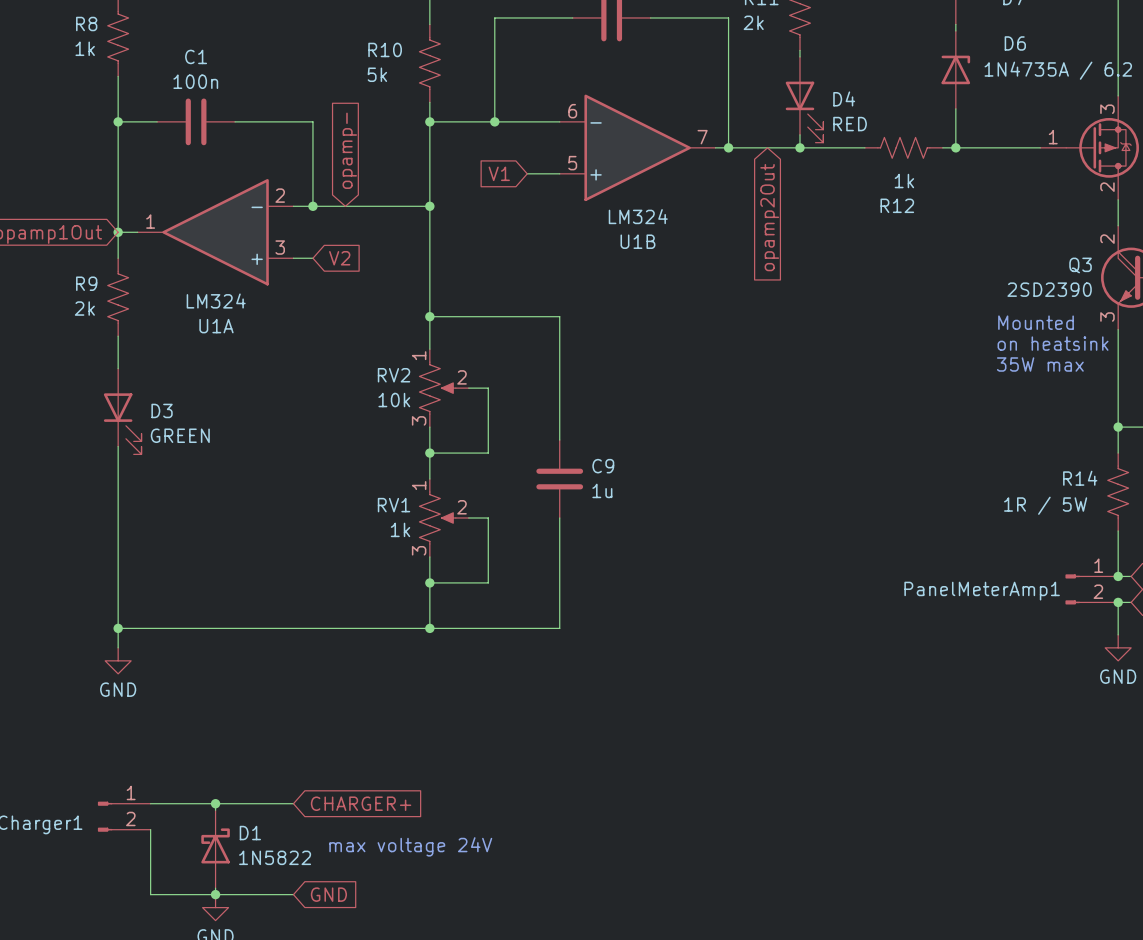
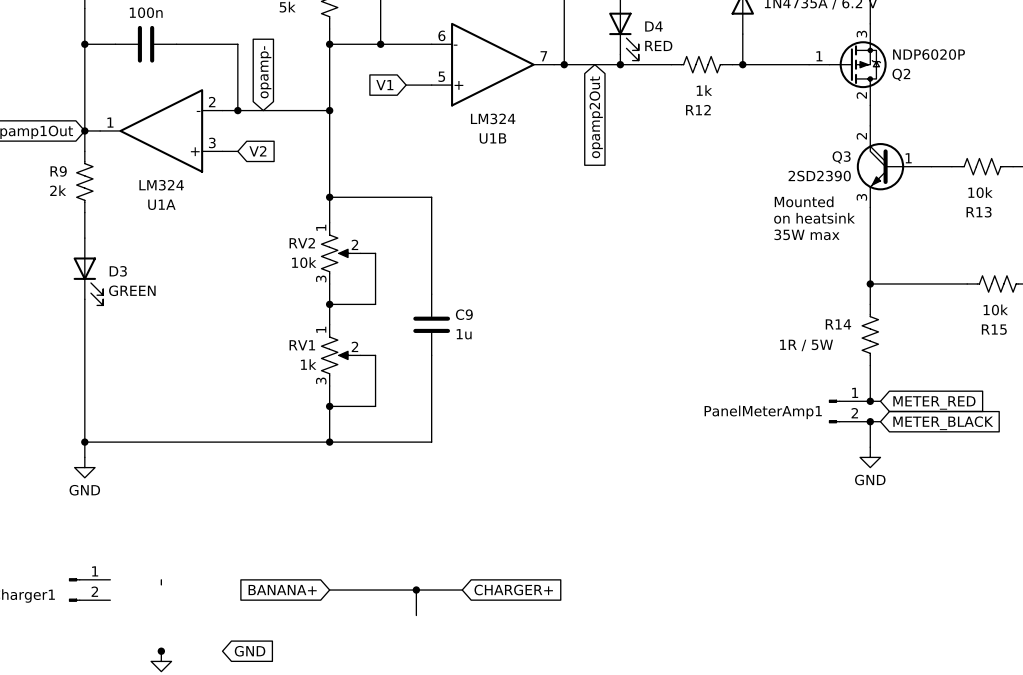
wire: (150, 803) (293, 803) -> none
junction: (215, 803) -> none
global label: CHARGER+ (361, 803) -> none
global label: none -> BANANA+ (282, 590)
wire: none -> (329, 590) (462, 590)
wire: none -> (416, 590) (416, 615)
junction: none -> (416, 590)
global label: none -> CHARGER+ (513, 590)
wire: (150, 829) (150, 894) (293, 894) -> none
text: max voltage 24V (410, 846) -> none
D1: 1N5822 (215, 849) -> none

